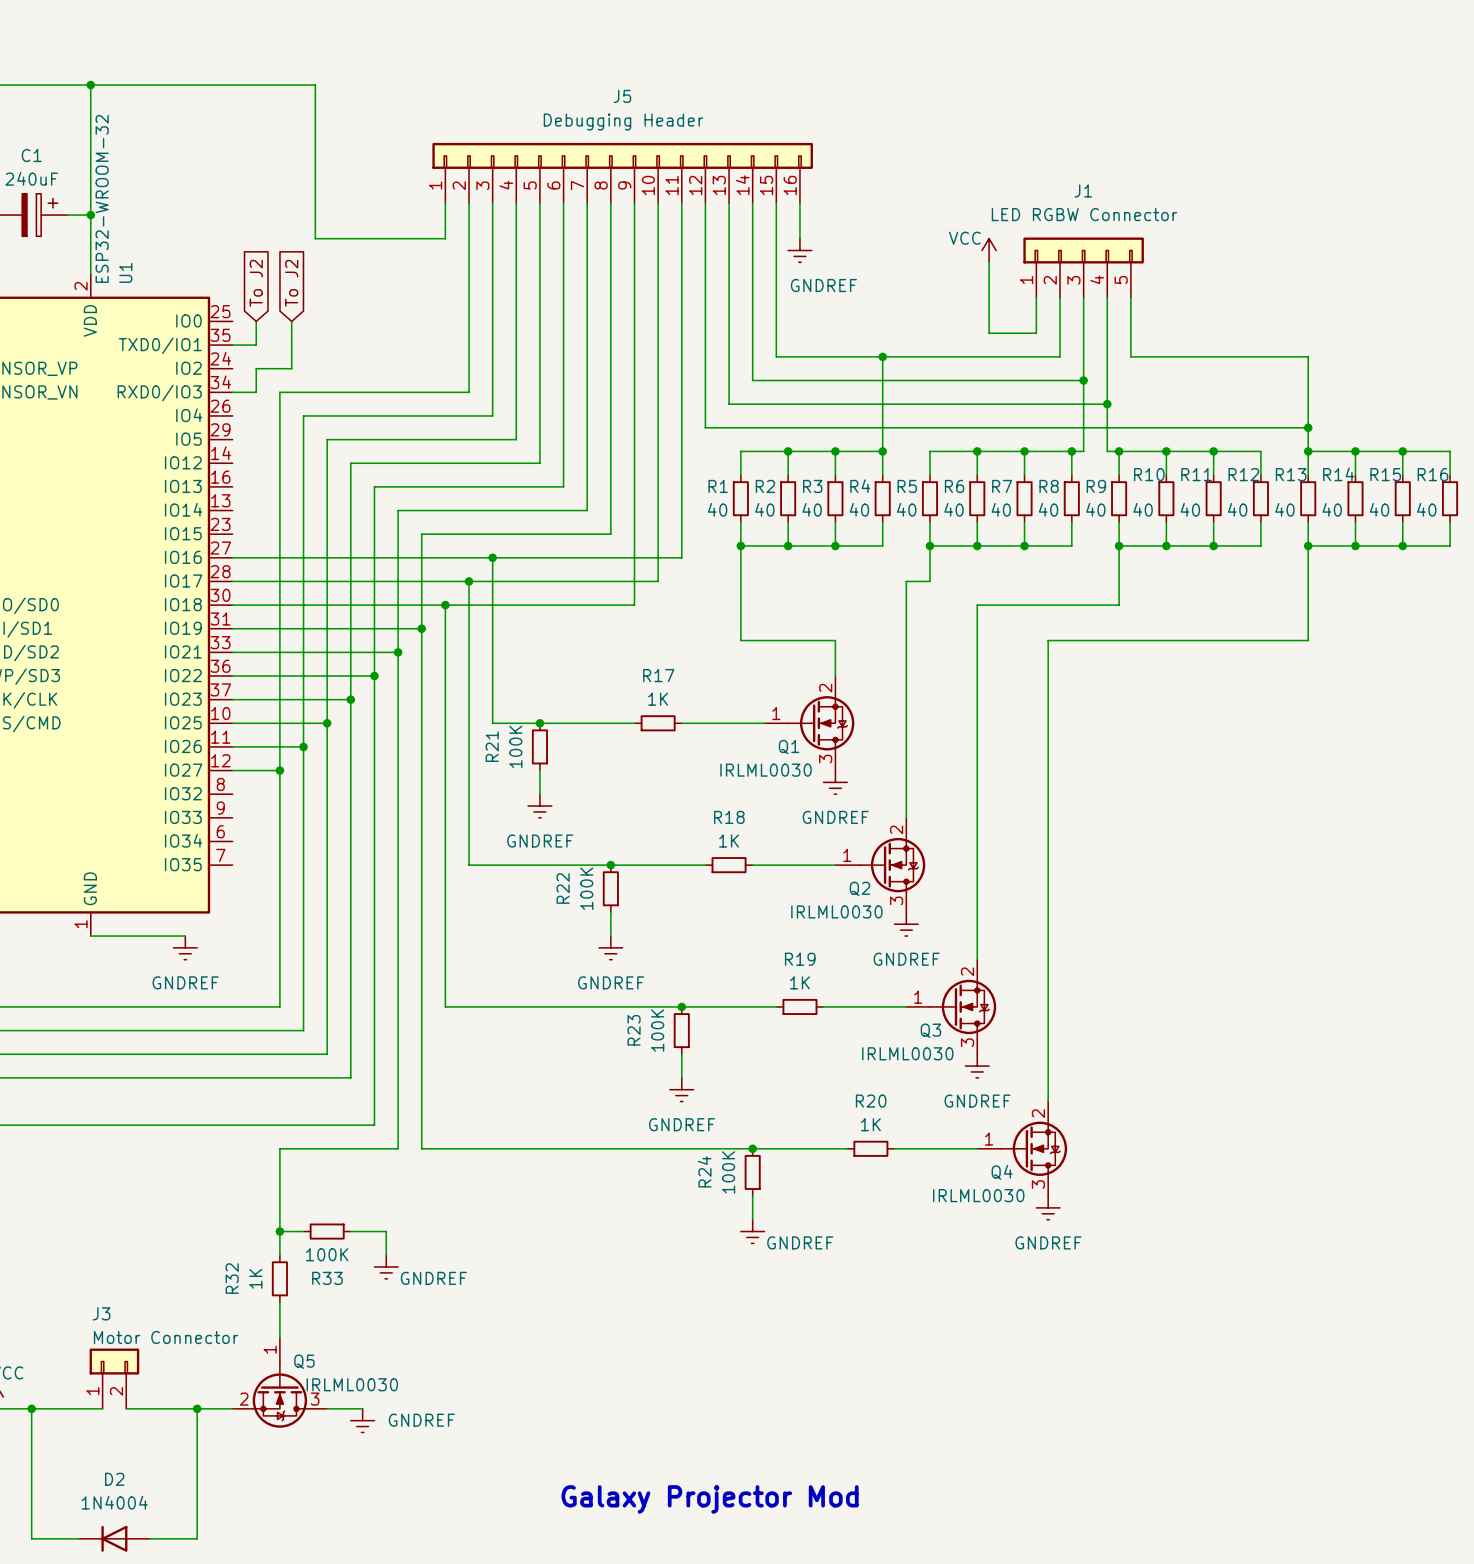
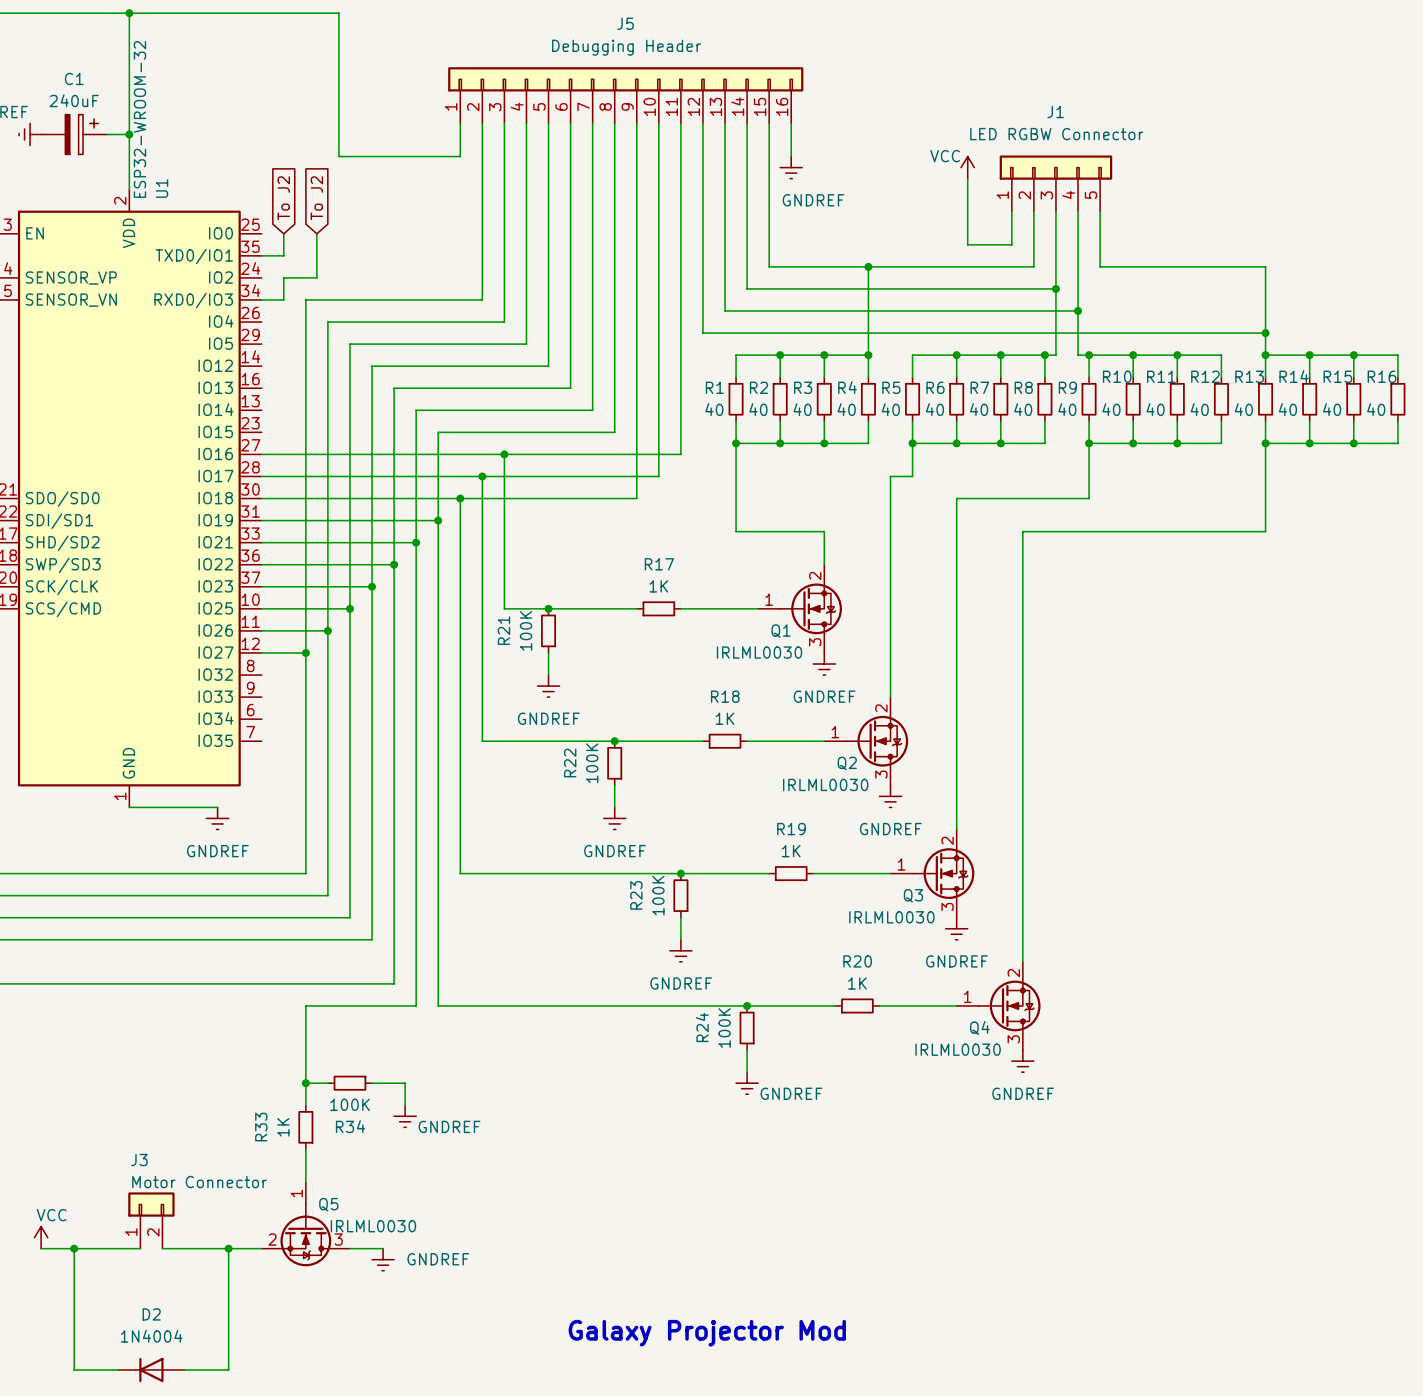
R32 name: R32 (232, 1278) -> R33 (261, 1127)
R33 name: R33 (327, 1278) -> R34 (350, 1126)

